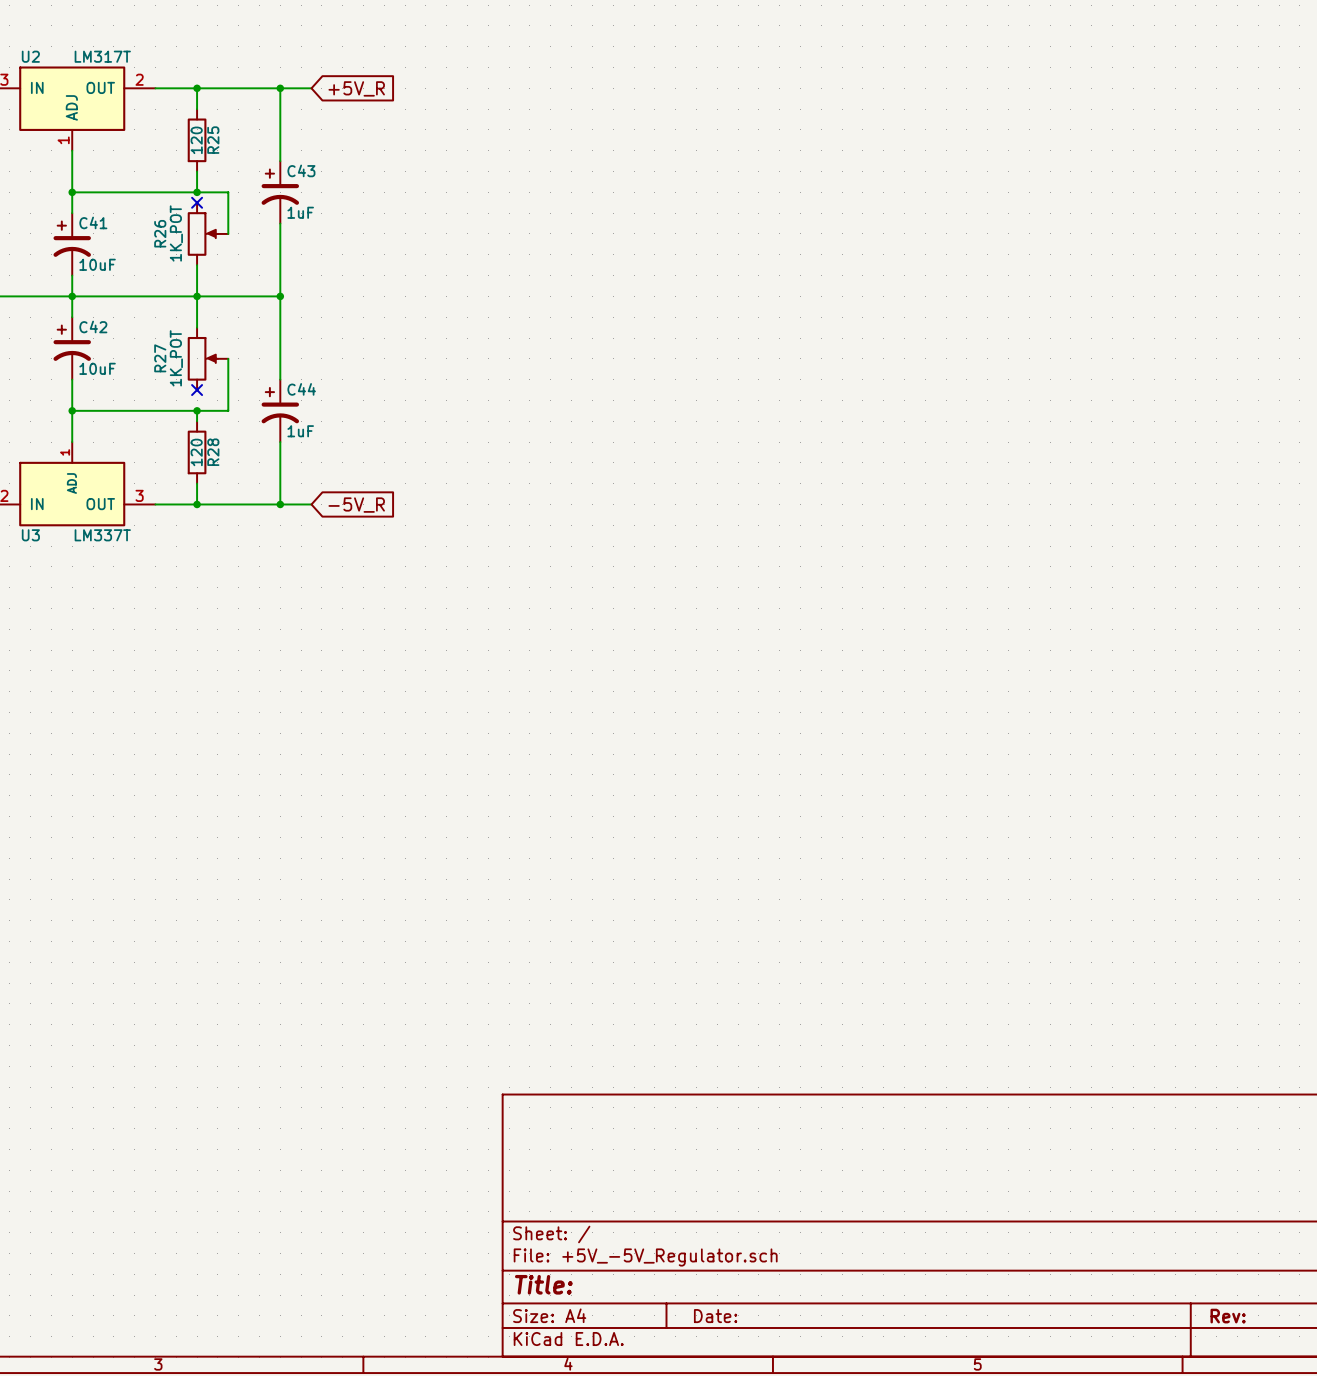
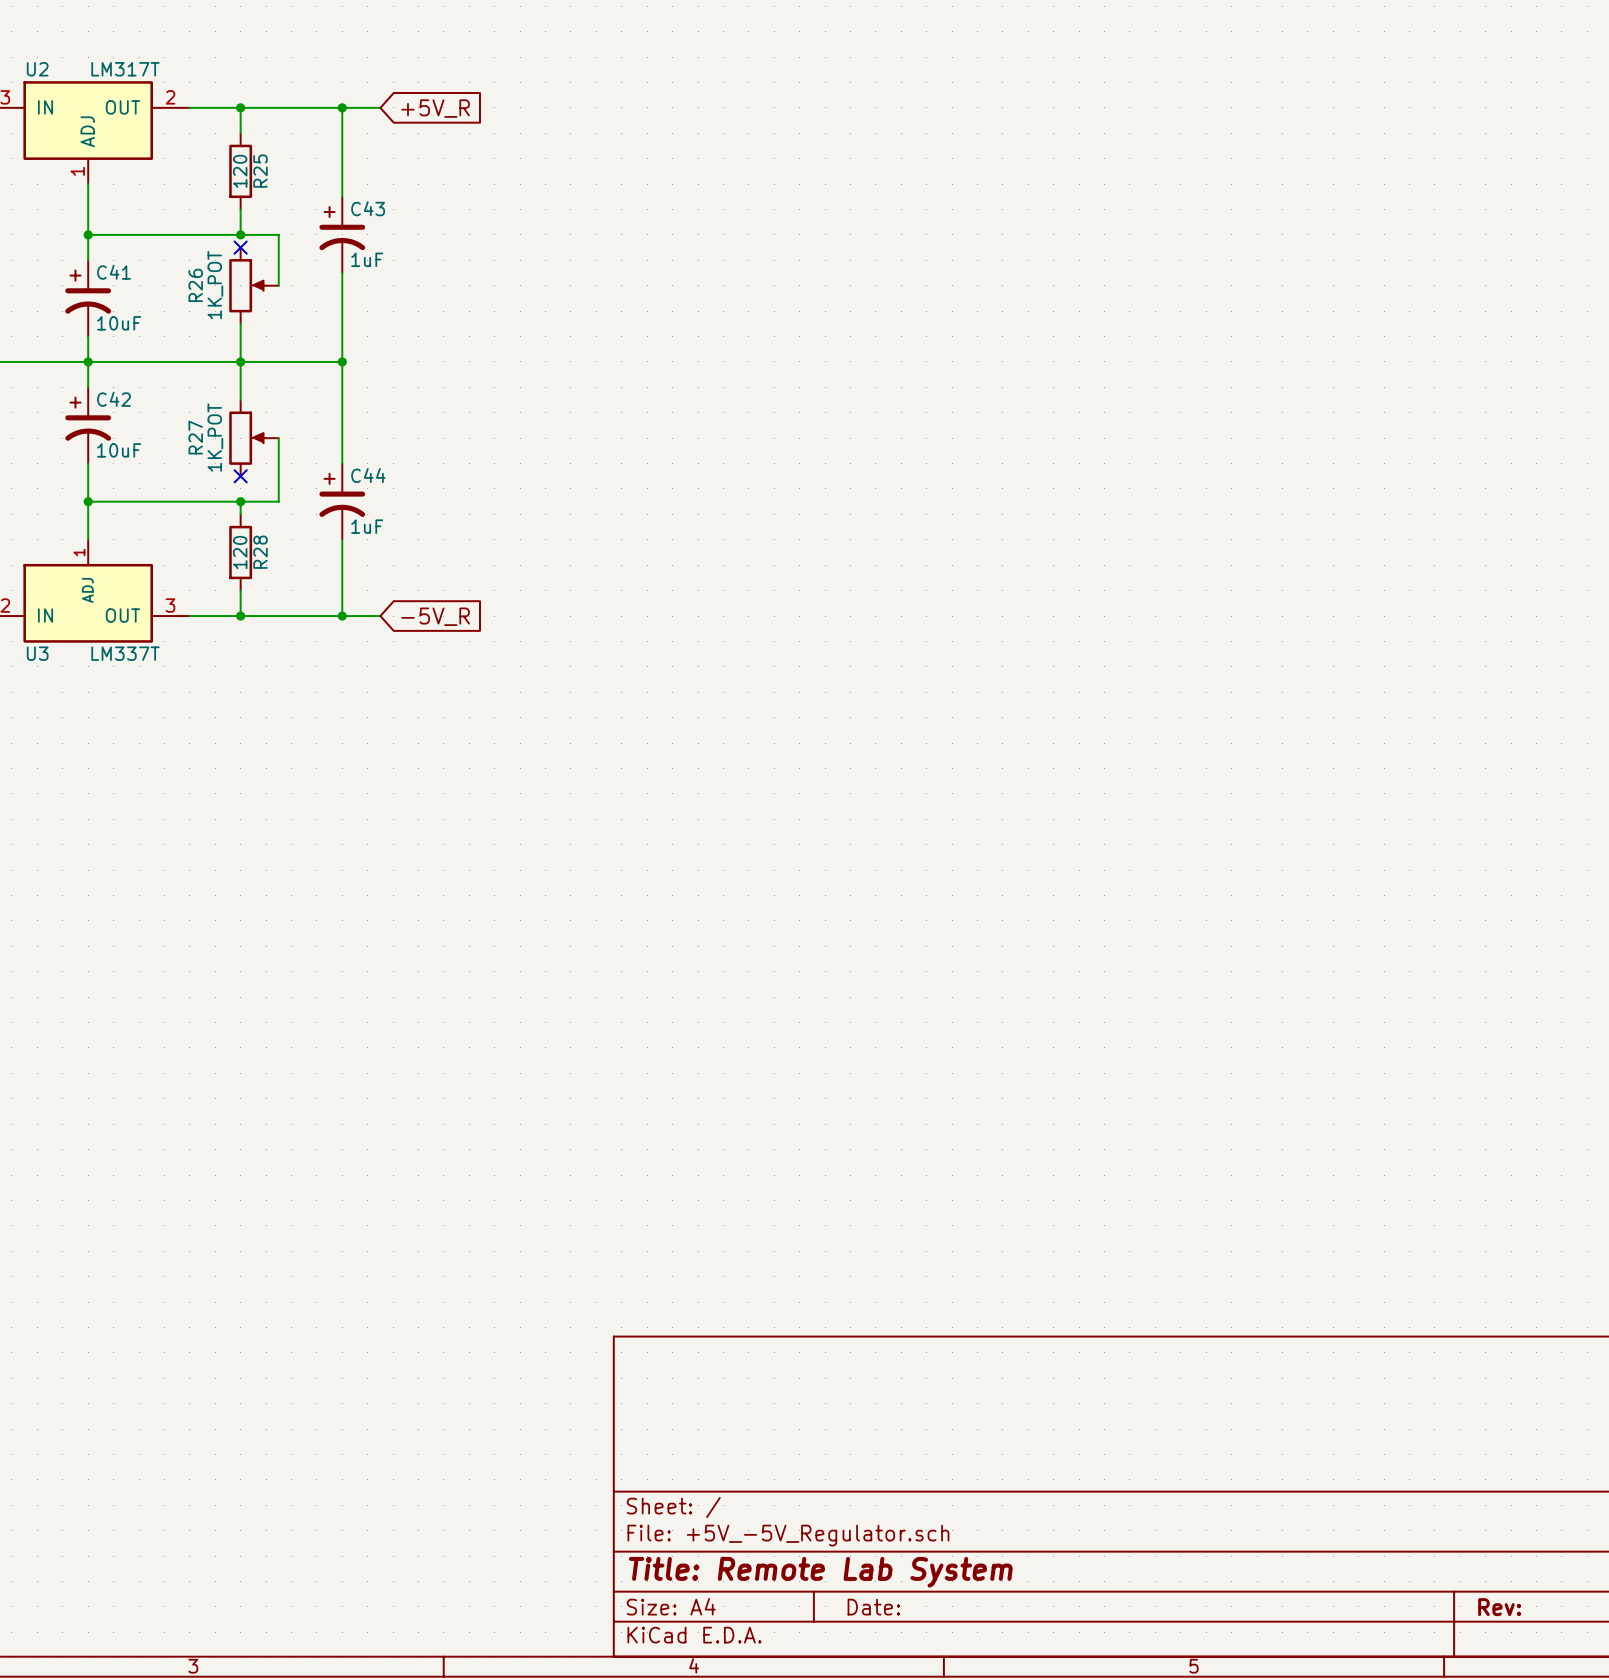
title block: Title: (543, 1284) -> Title: Remote Lab System (820, 1572)

